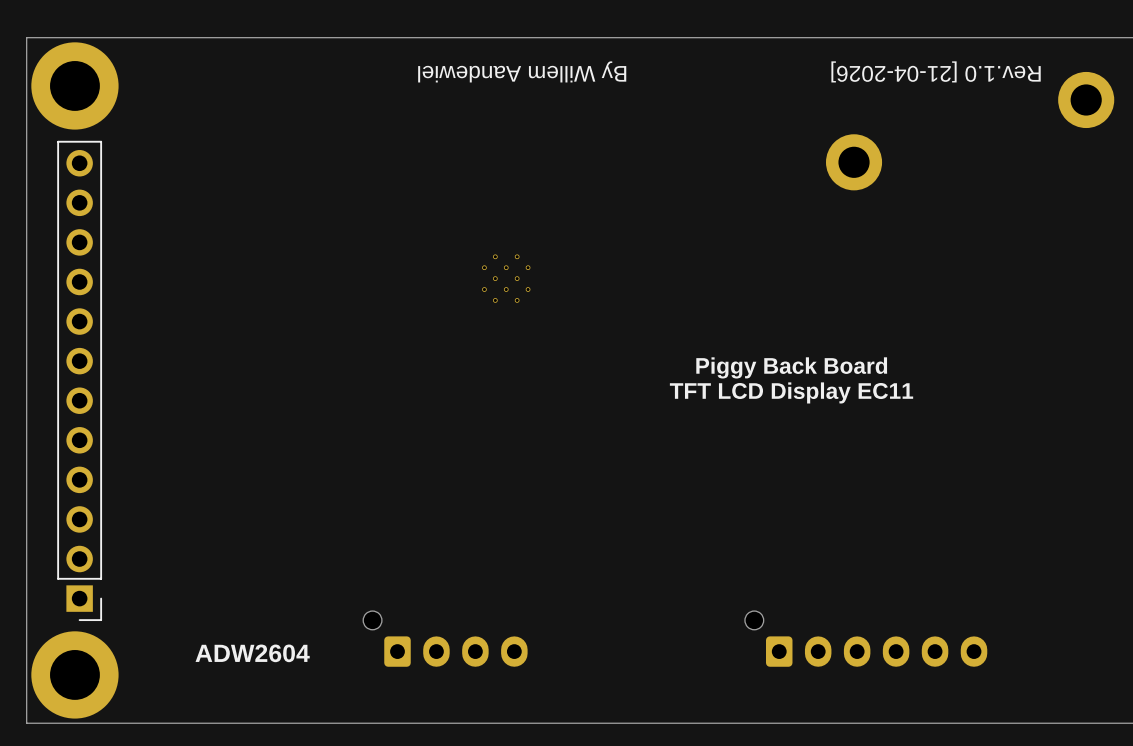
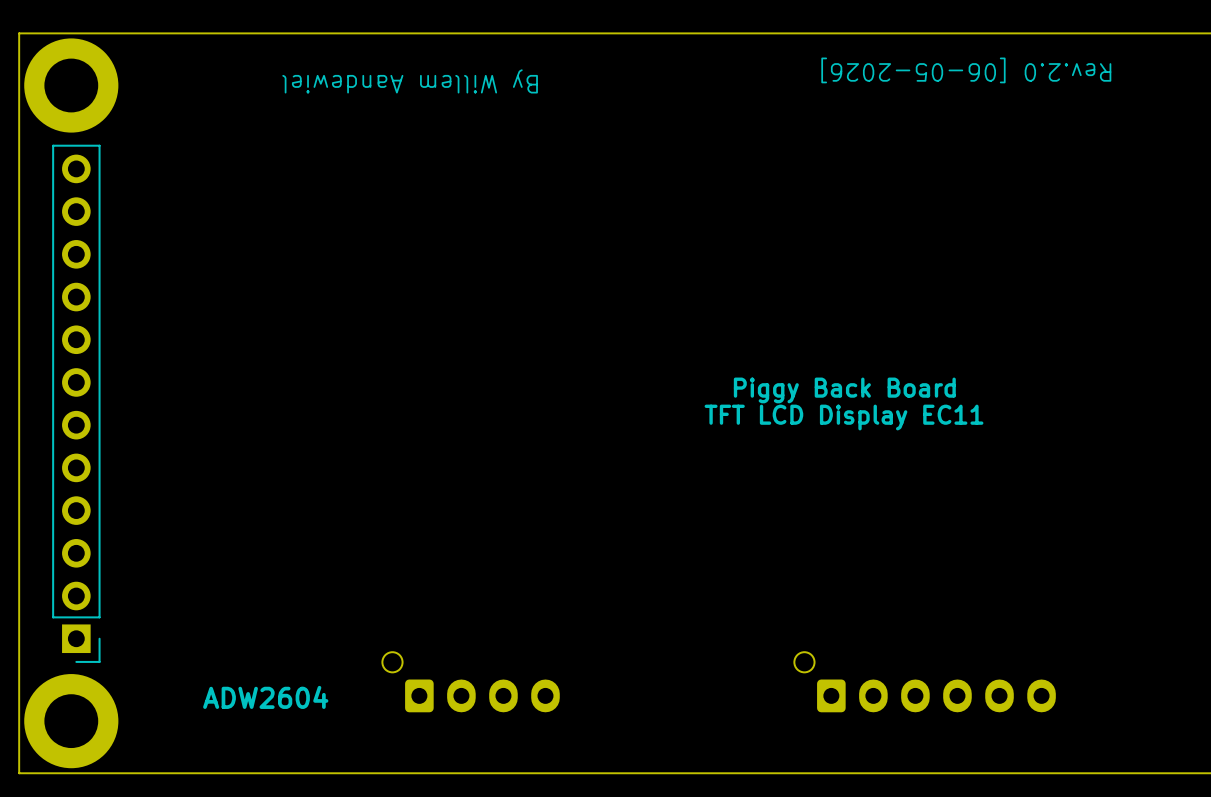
text position: By Willem Aandewiel (522, 71) -> By Willem Aandewiel (410, 81)
text: Rev.1.0 [21-04-2026] (936, 71) -> Rev.2.0 [06-05-2026] (966, 70)
part: (1086, 99) -> none
part: (854, 162) -> none
part: (506, 278) -> none

